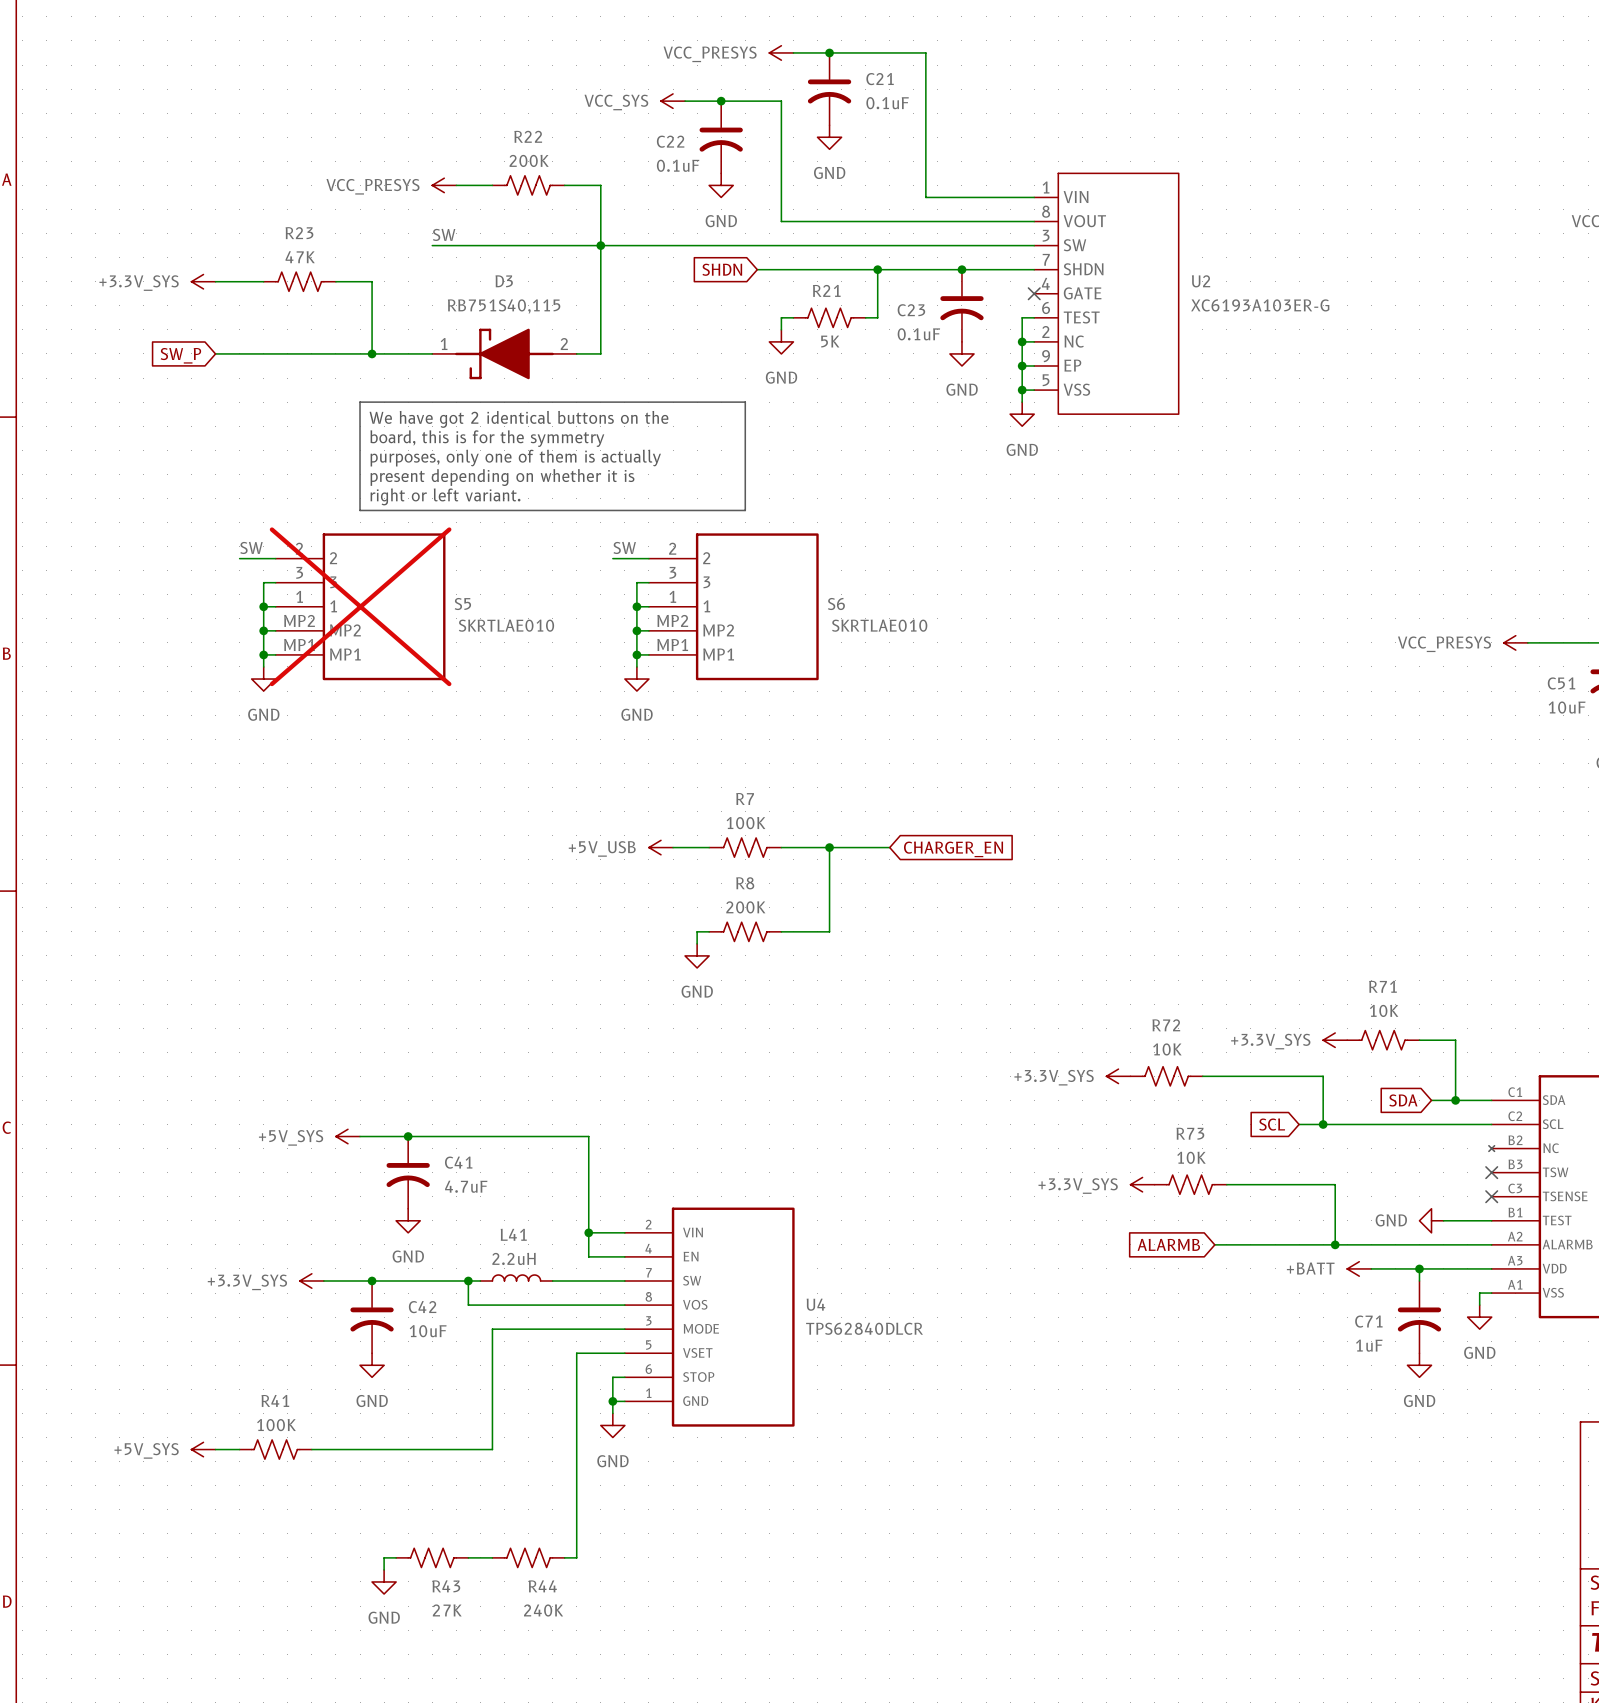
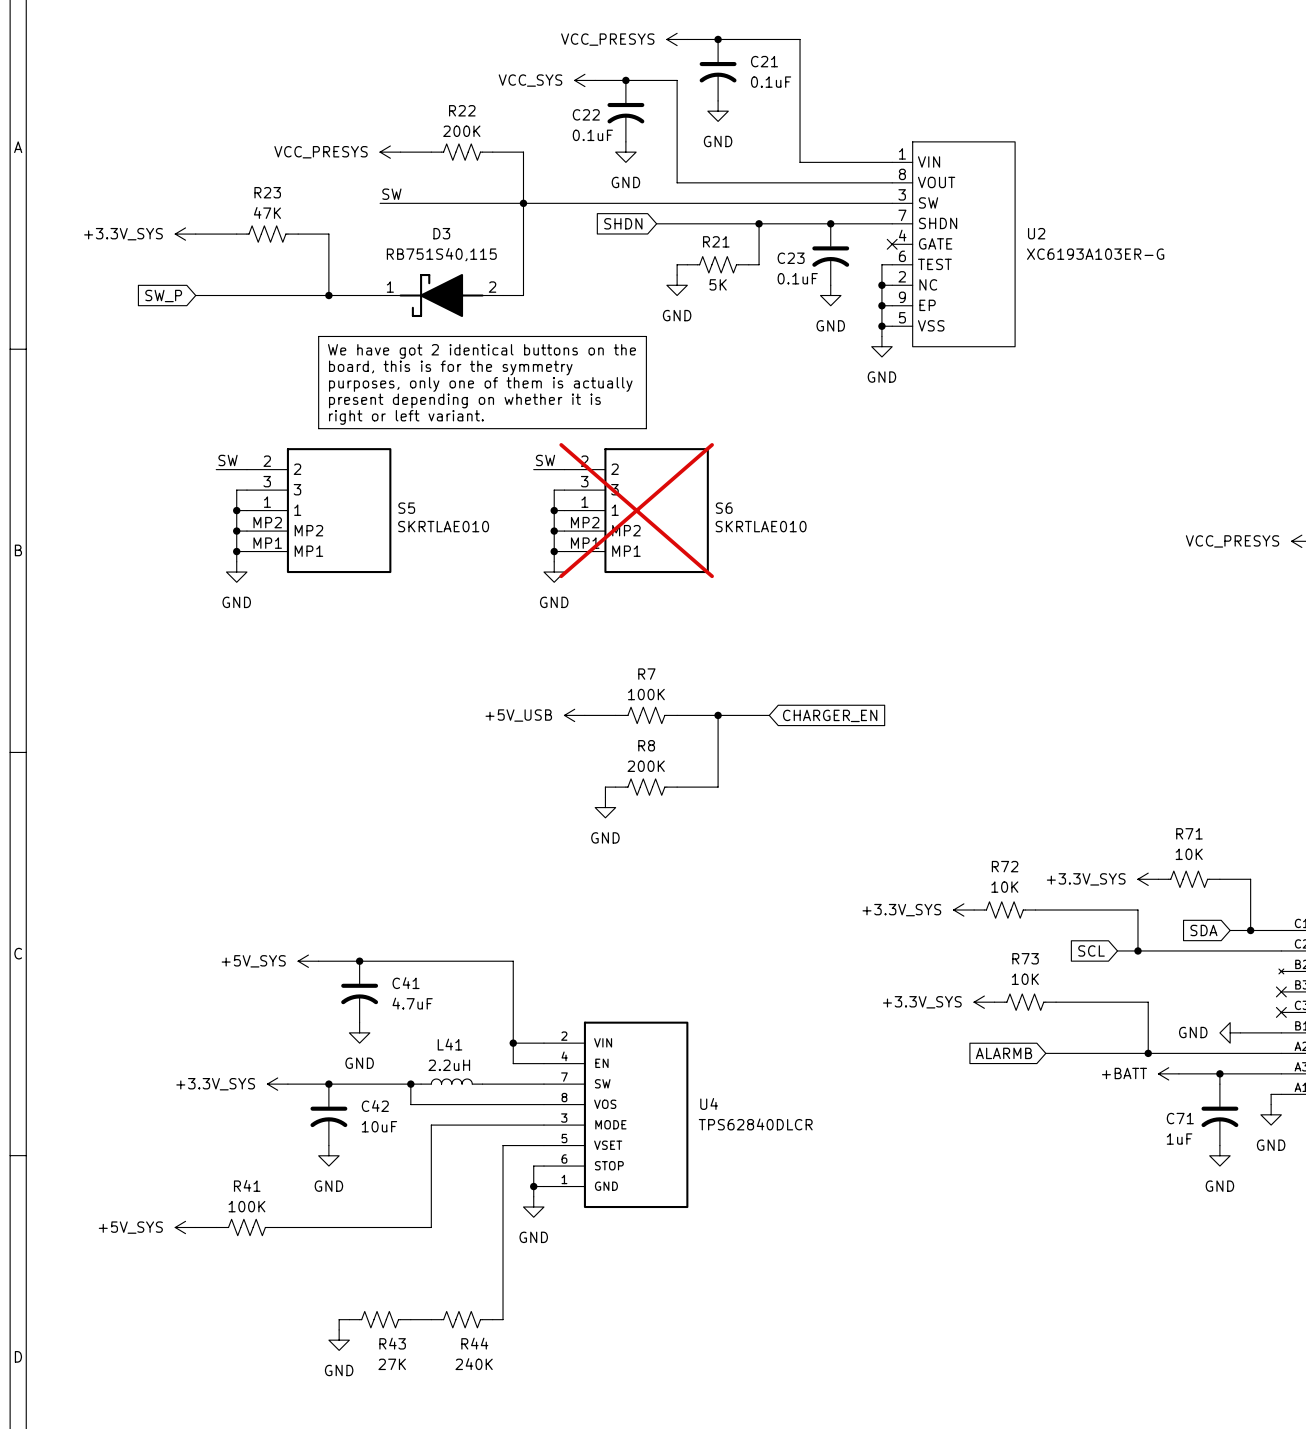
S5 do-not-place cross: (360, 606) -> none
S6 do-not-place cross: none -> (636, 510)

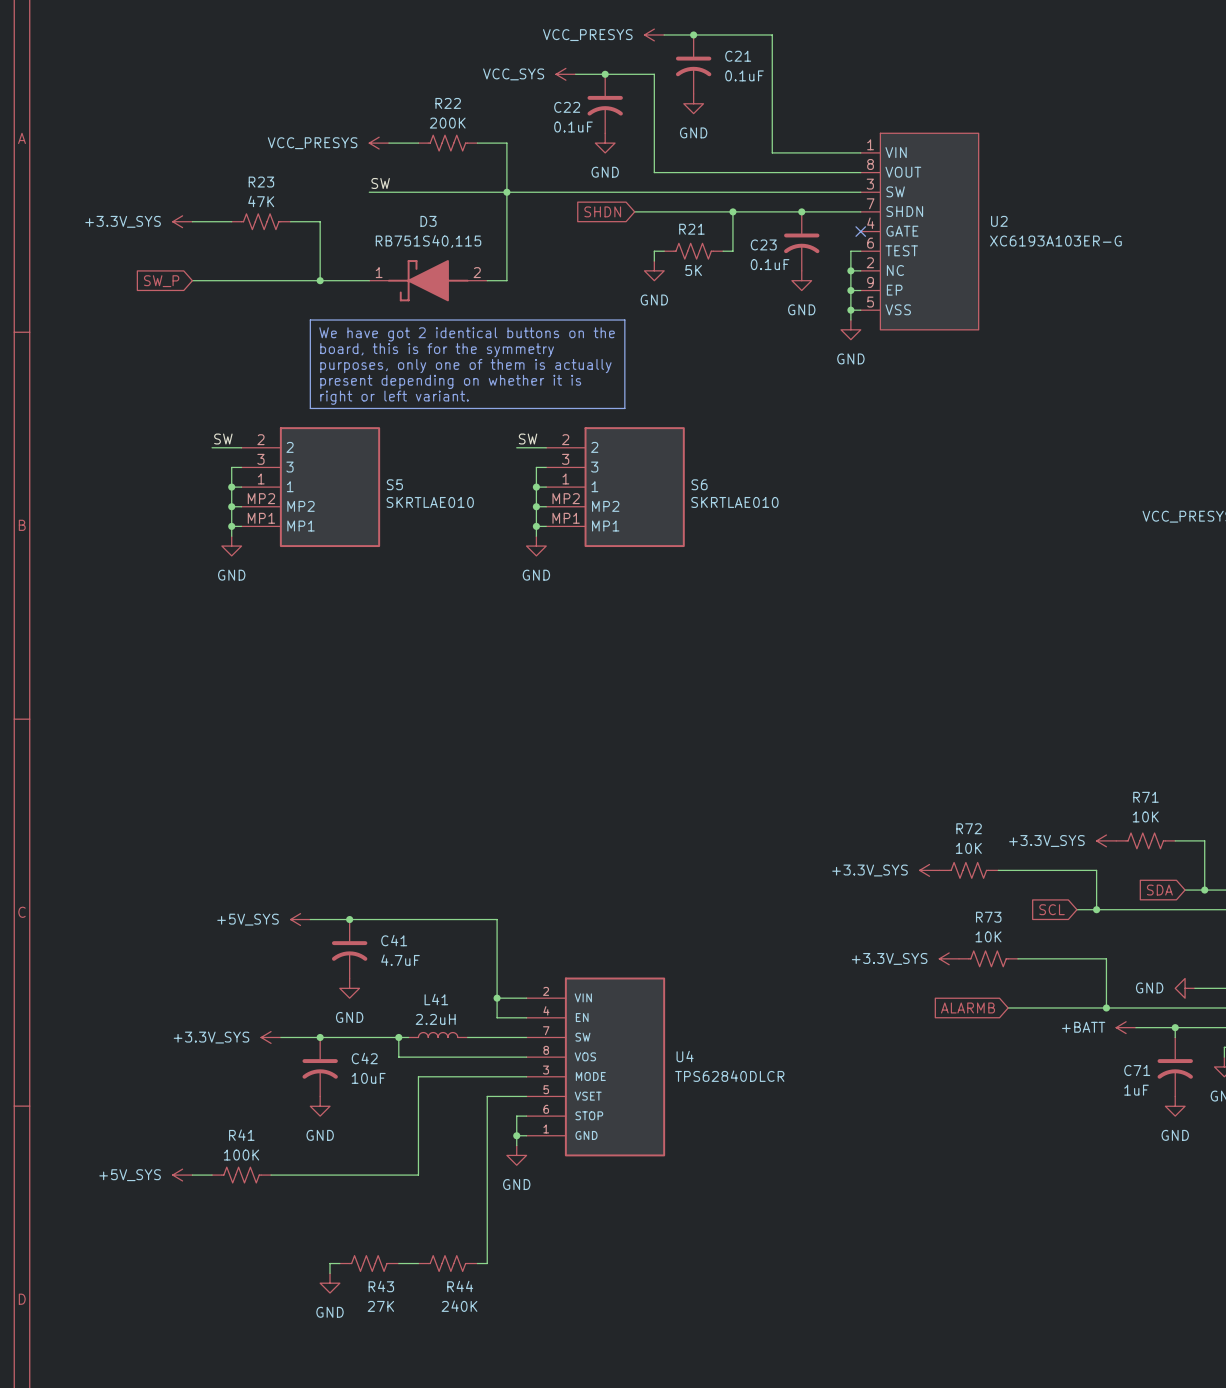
S6 do-not-place cross: (636, 510) -> none
power symbol: +5V_USB (574, 715) -> none
wire: (584, 715) (615, 715) -> none
R7: 100K (646, 715) -> none
wire: (677, 715) (769, 715) -> none
wire: (718, 715) (718, 787) (677, 787) -> none
junction: (718, 715) -> none
global label: CHARGER_EN (830, 715) -> none
wire: (615, 787) (605, 787) (605, 797) -> none
R8: 200K (646, 787) -> none
power symbol: GND (605, 807) -> none

